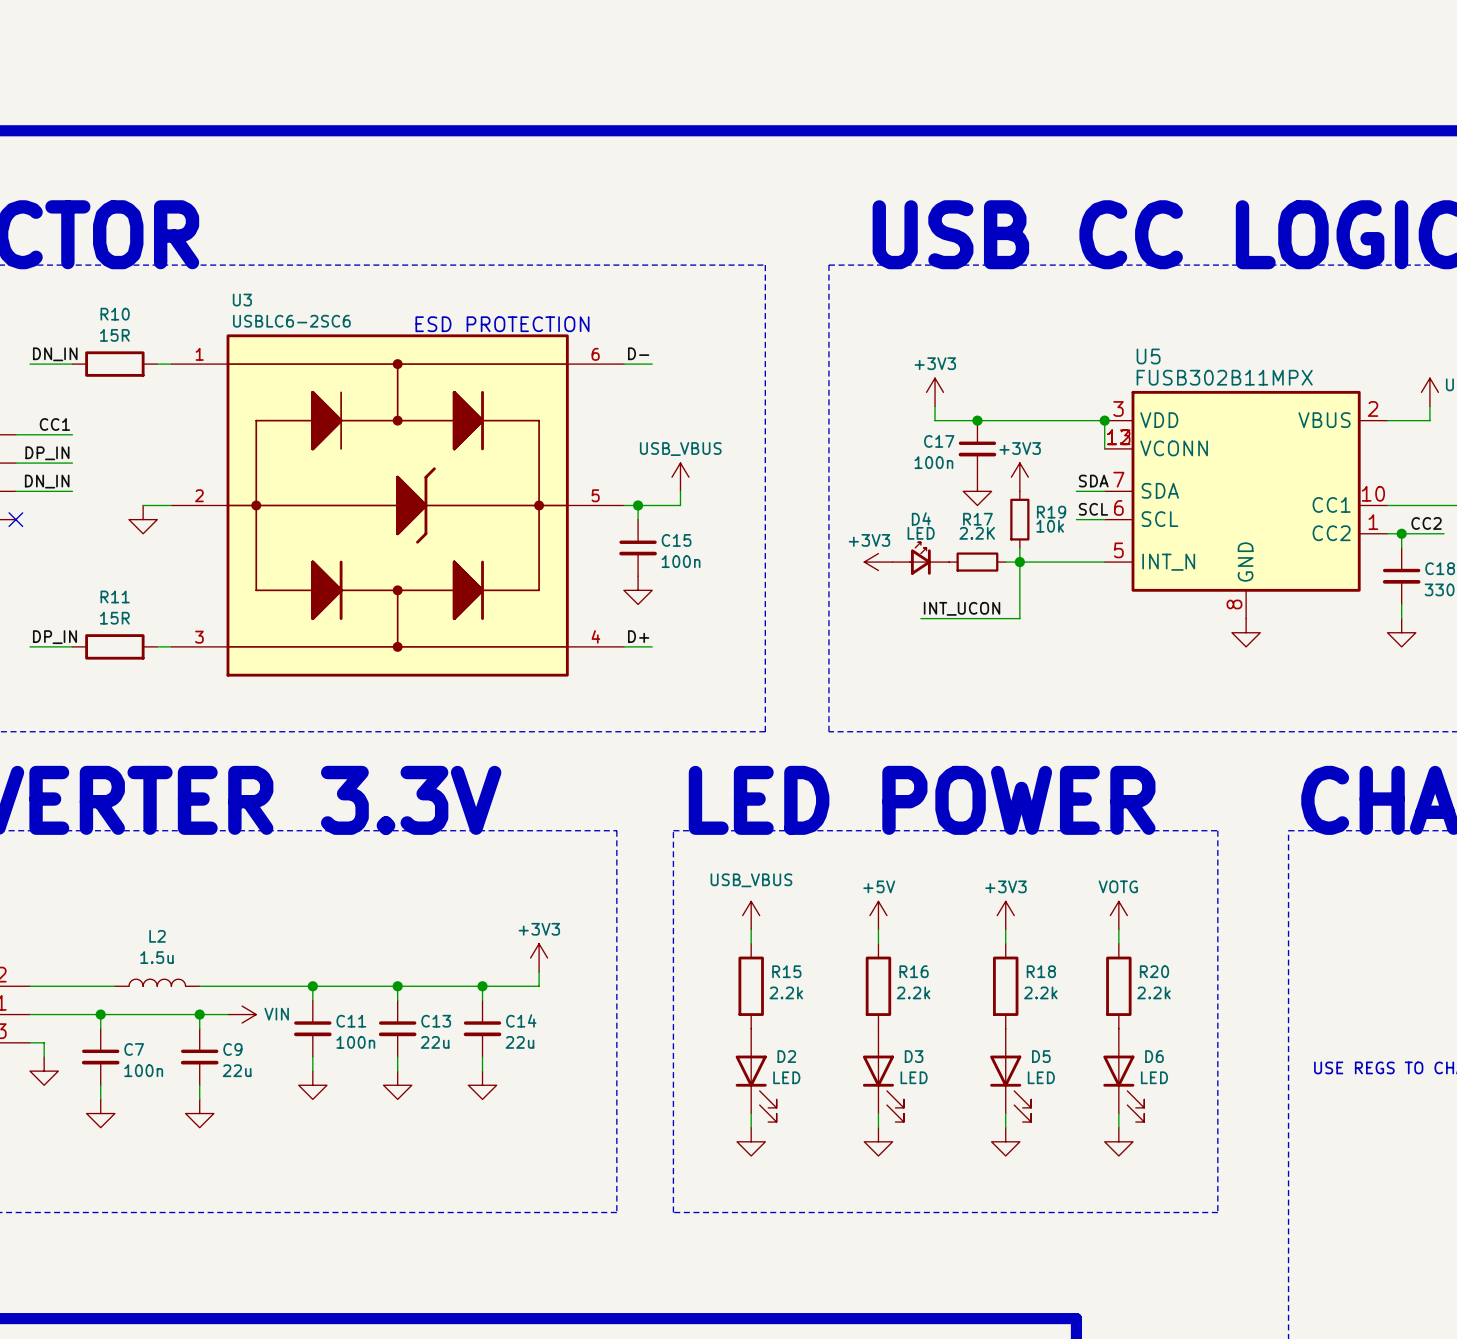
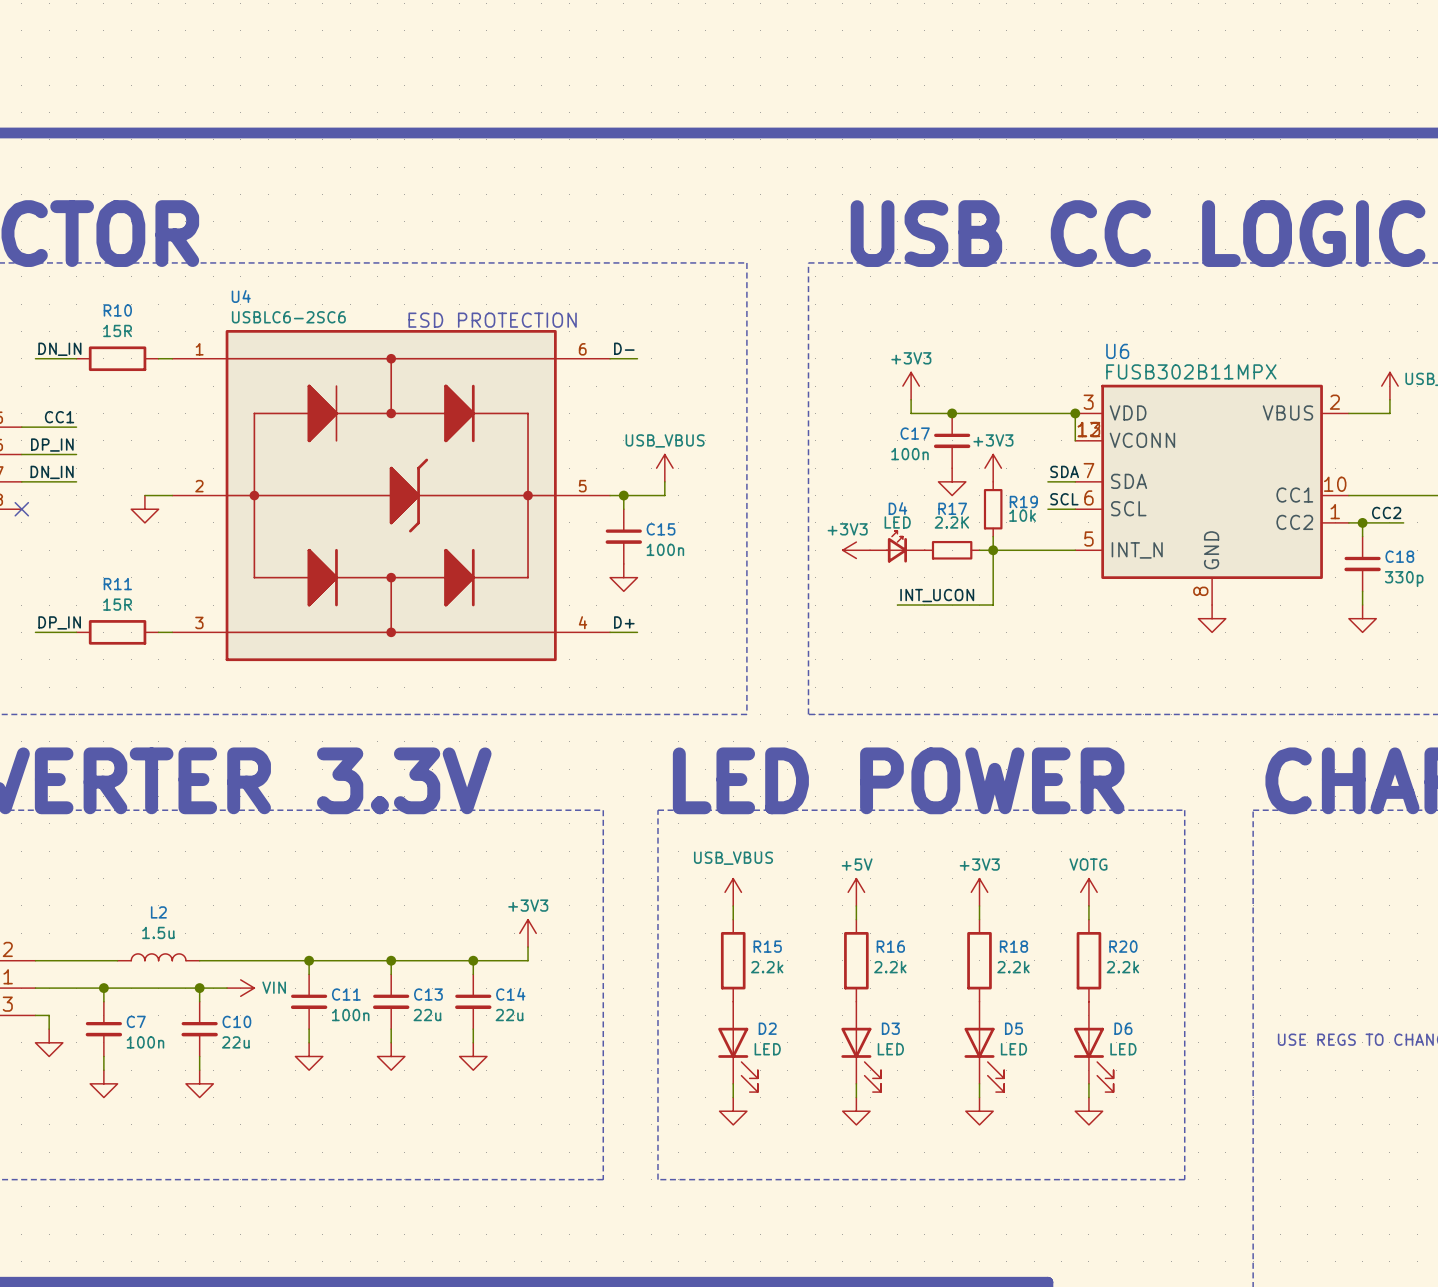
U3 name: U3 (242, 300) -> U4 (241, 296)
U5 name: U5 (1148, 356) -> U6 (1117, 351)
C9 name: C9 (232, 1049) -> C10 (236, 1021)

